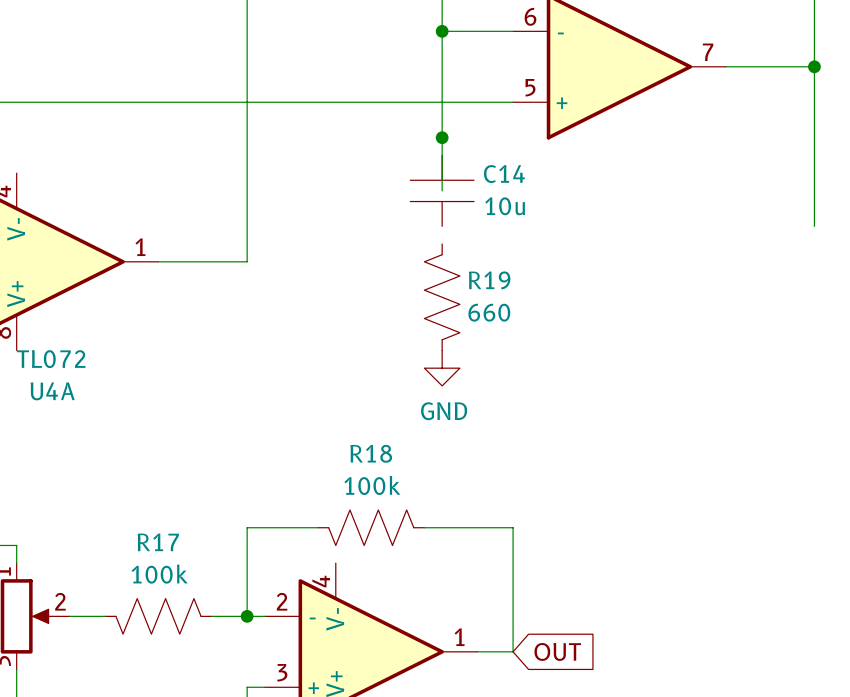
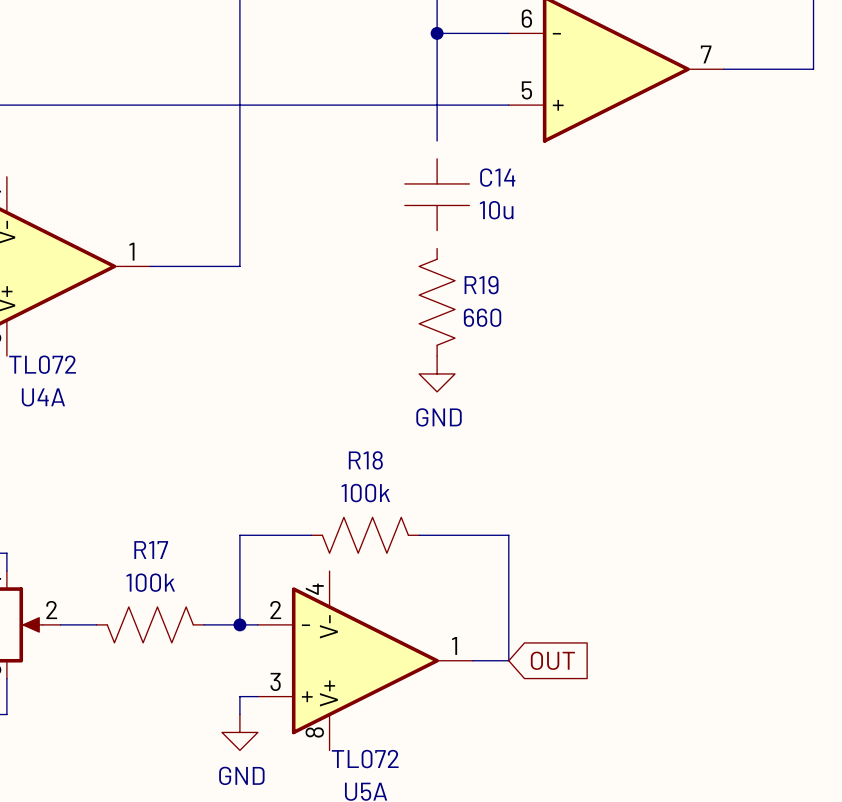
wire: (814, 66) (814, 226) -> none
junction: (814, 66) -> none
wire: (442, 137) (442, 190) -> none
junction: (442, 137) -> none

